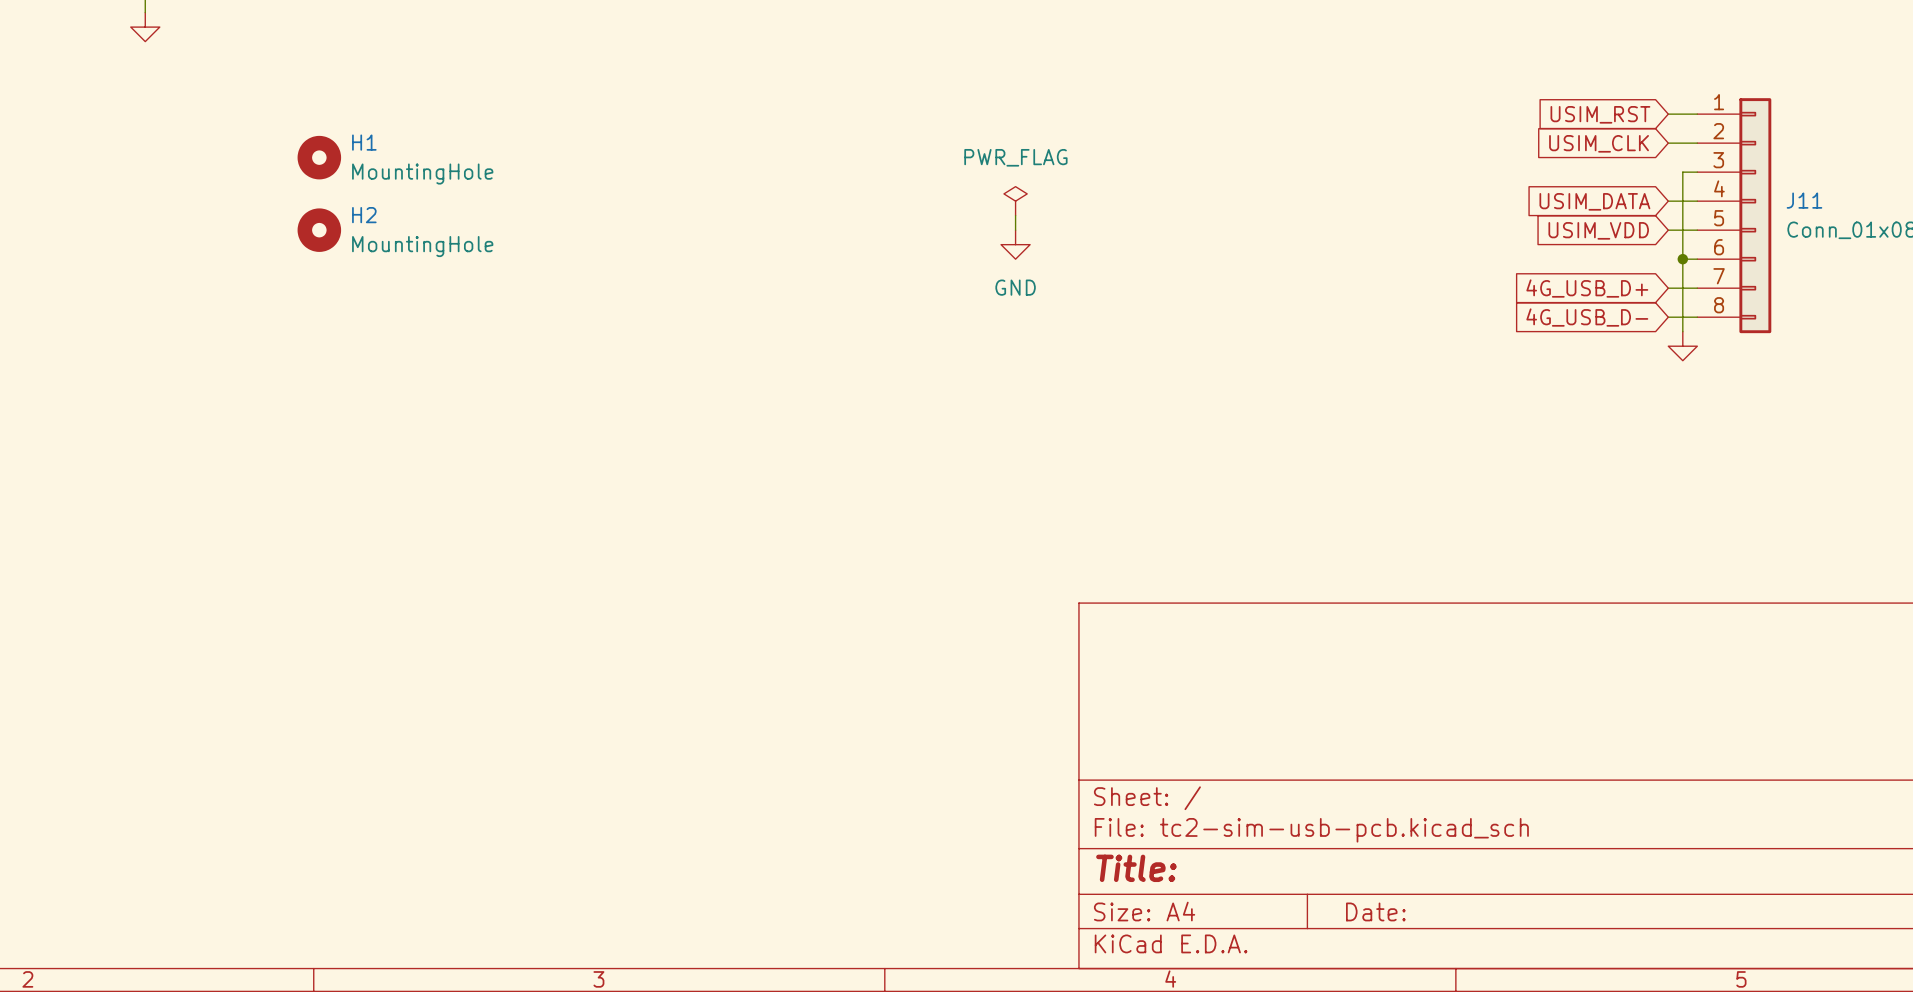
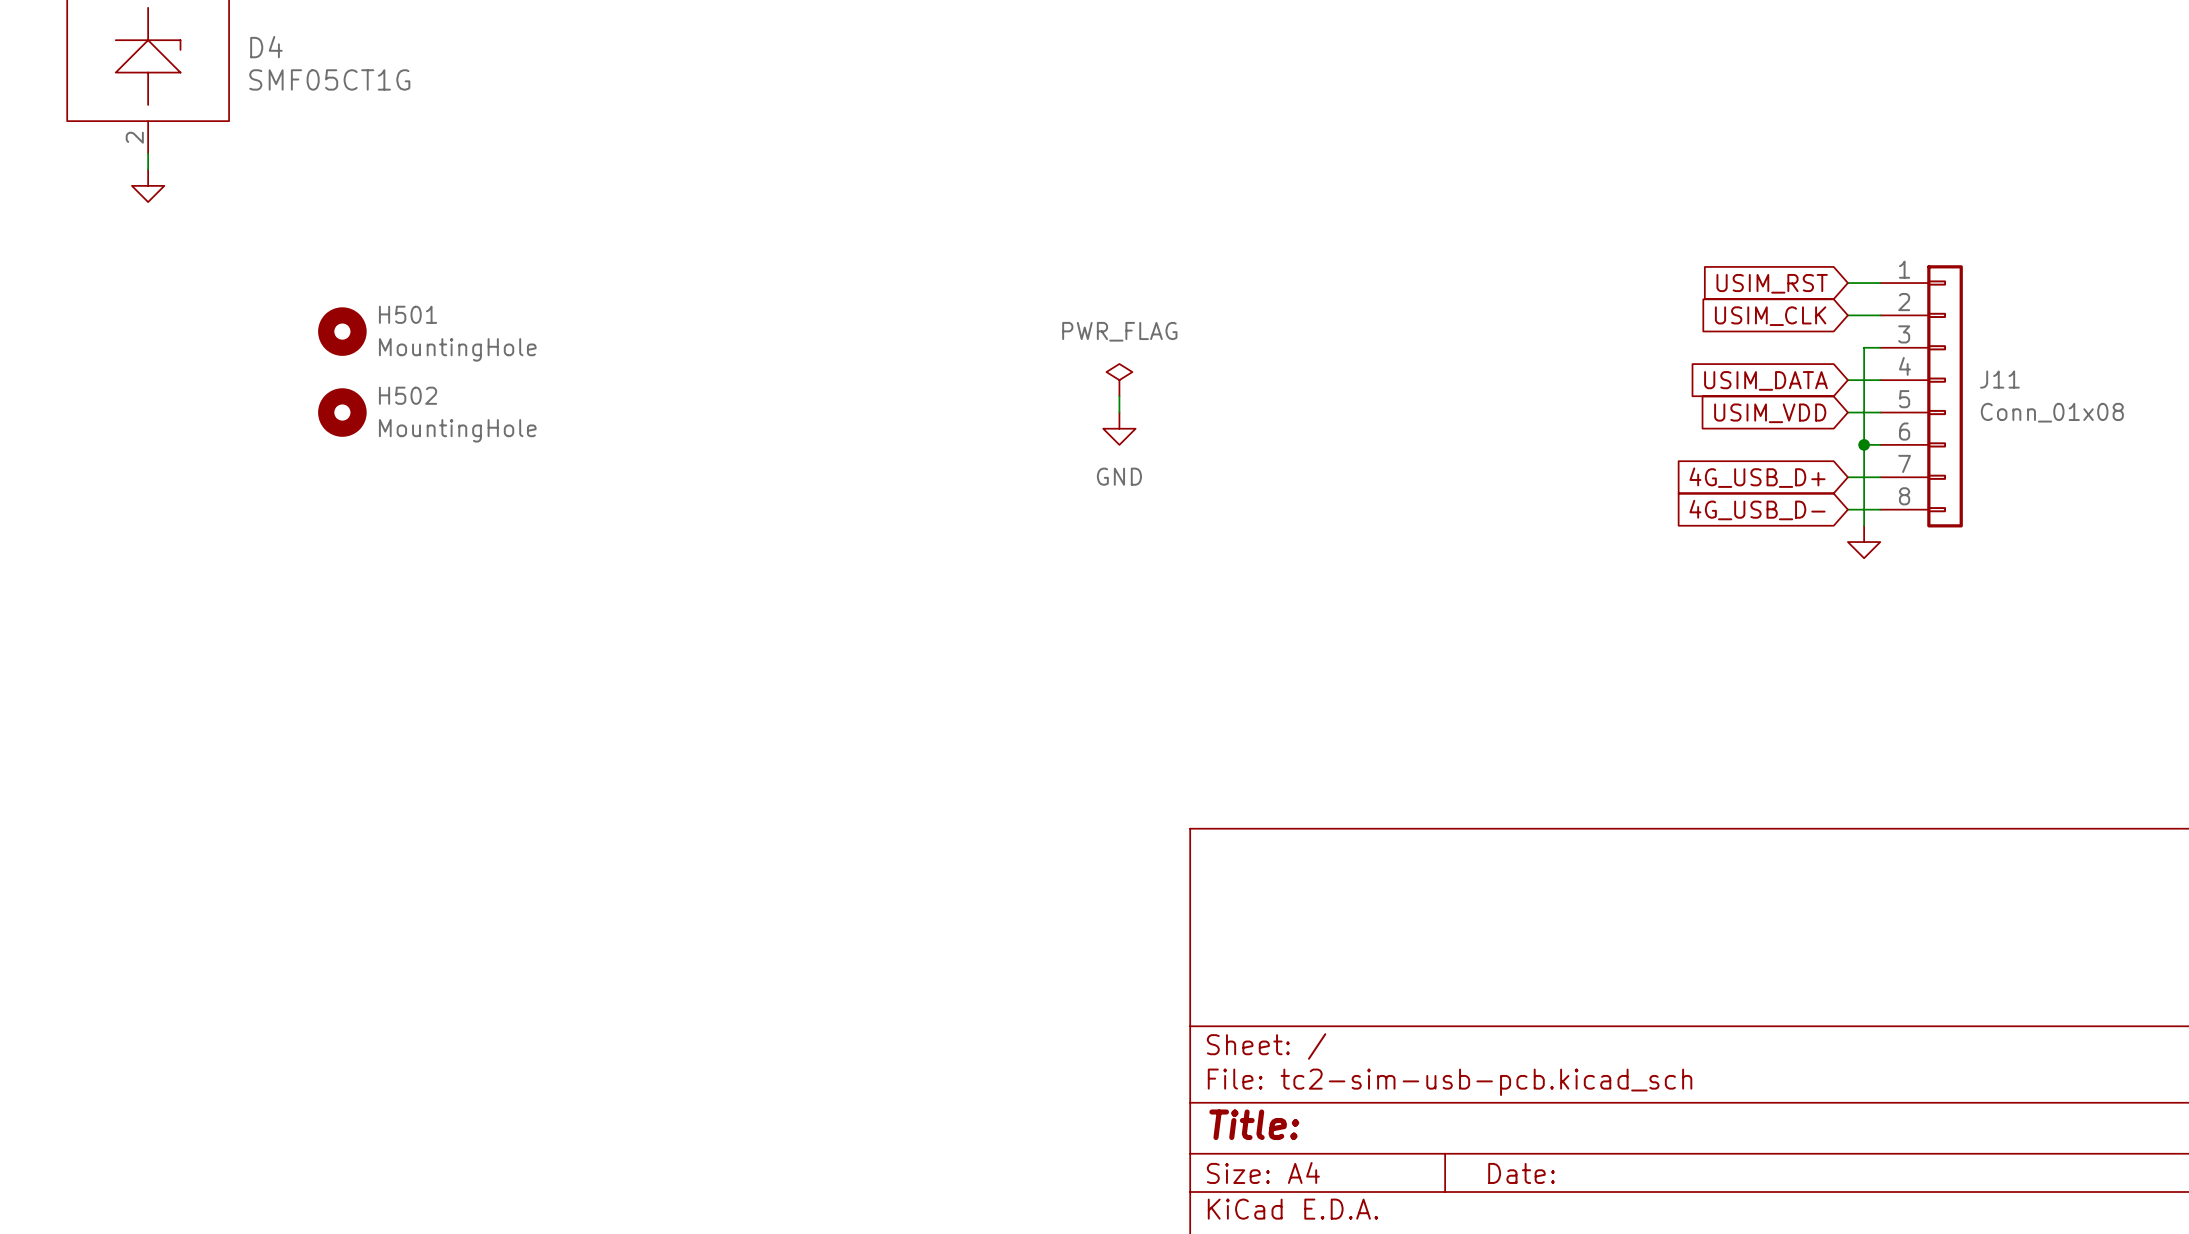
H1 name: H1 (364, 142) -> H501 (408, 314)
H2 name: H2 (364, 215) -> H502 (408, 395)

